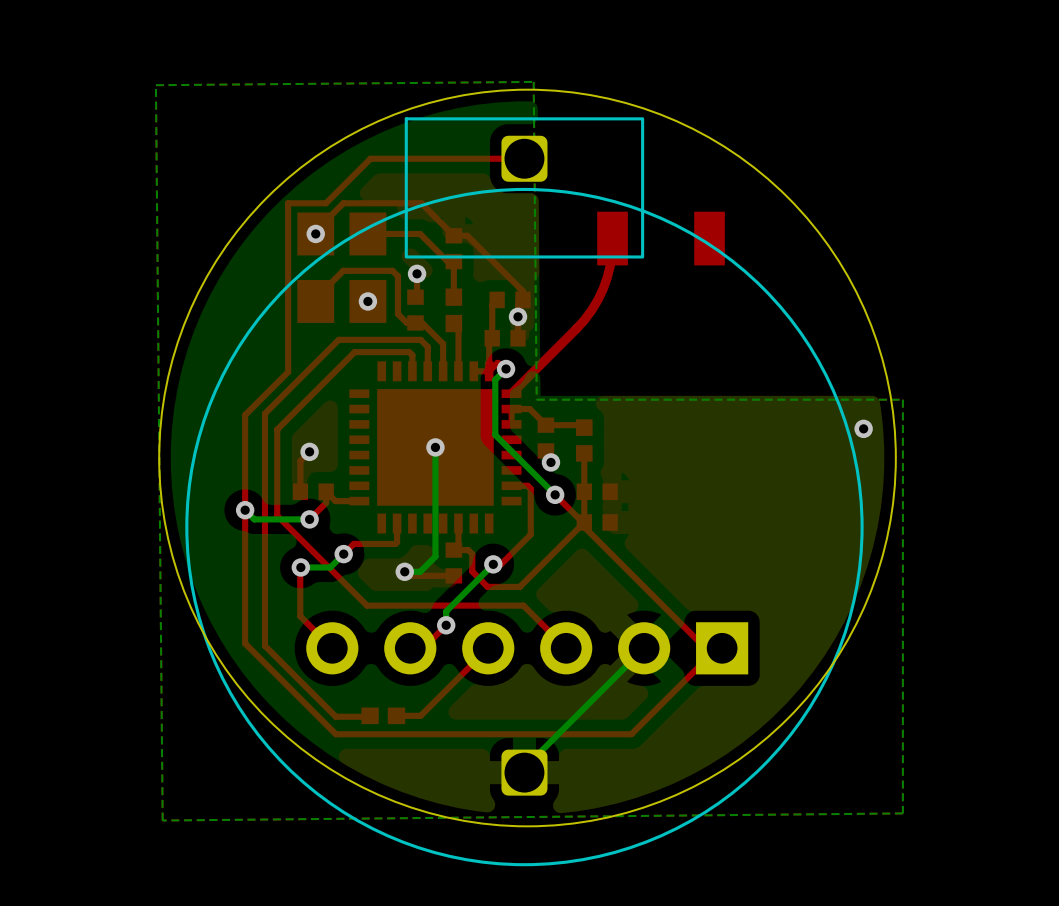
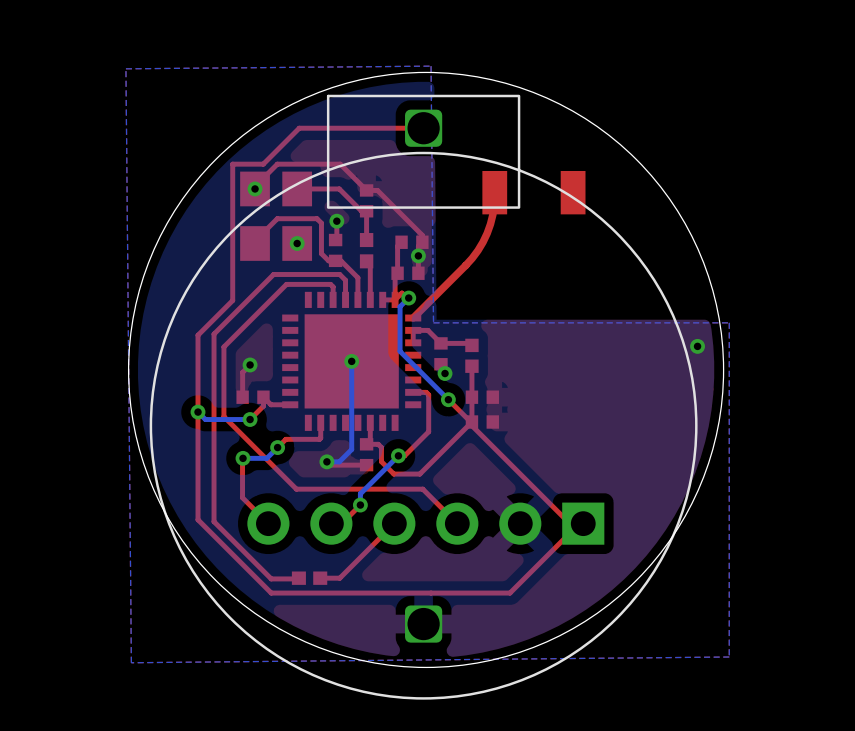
bottom track: (644, 648) (524, 768) (524, 772) -> none

